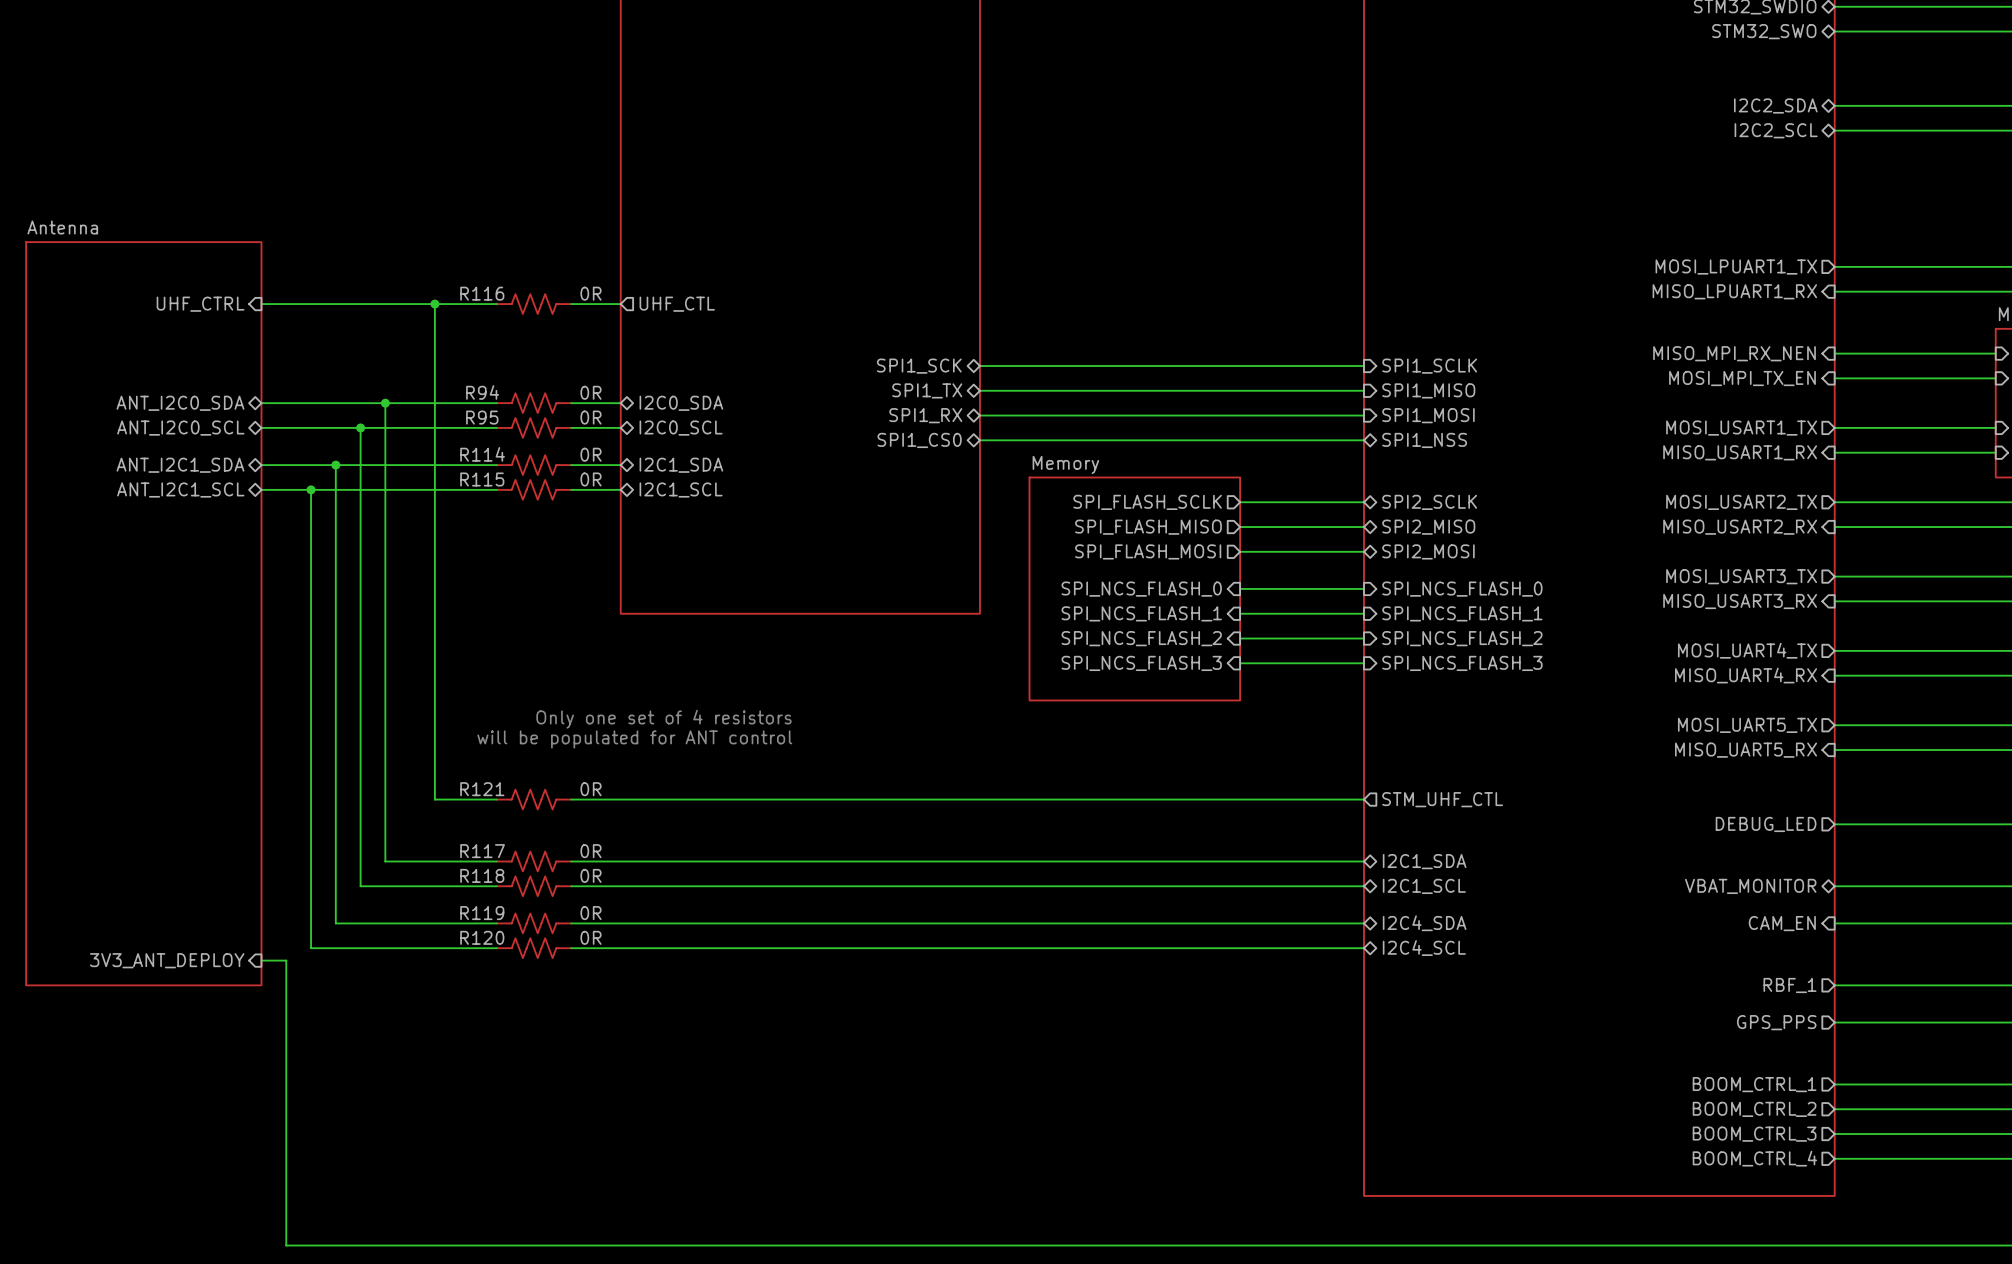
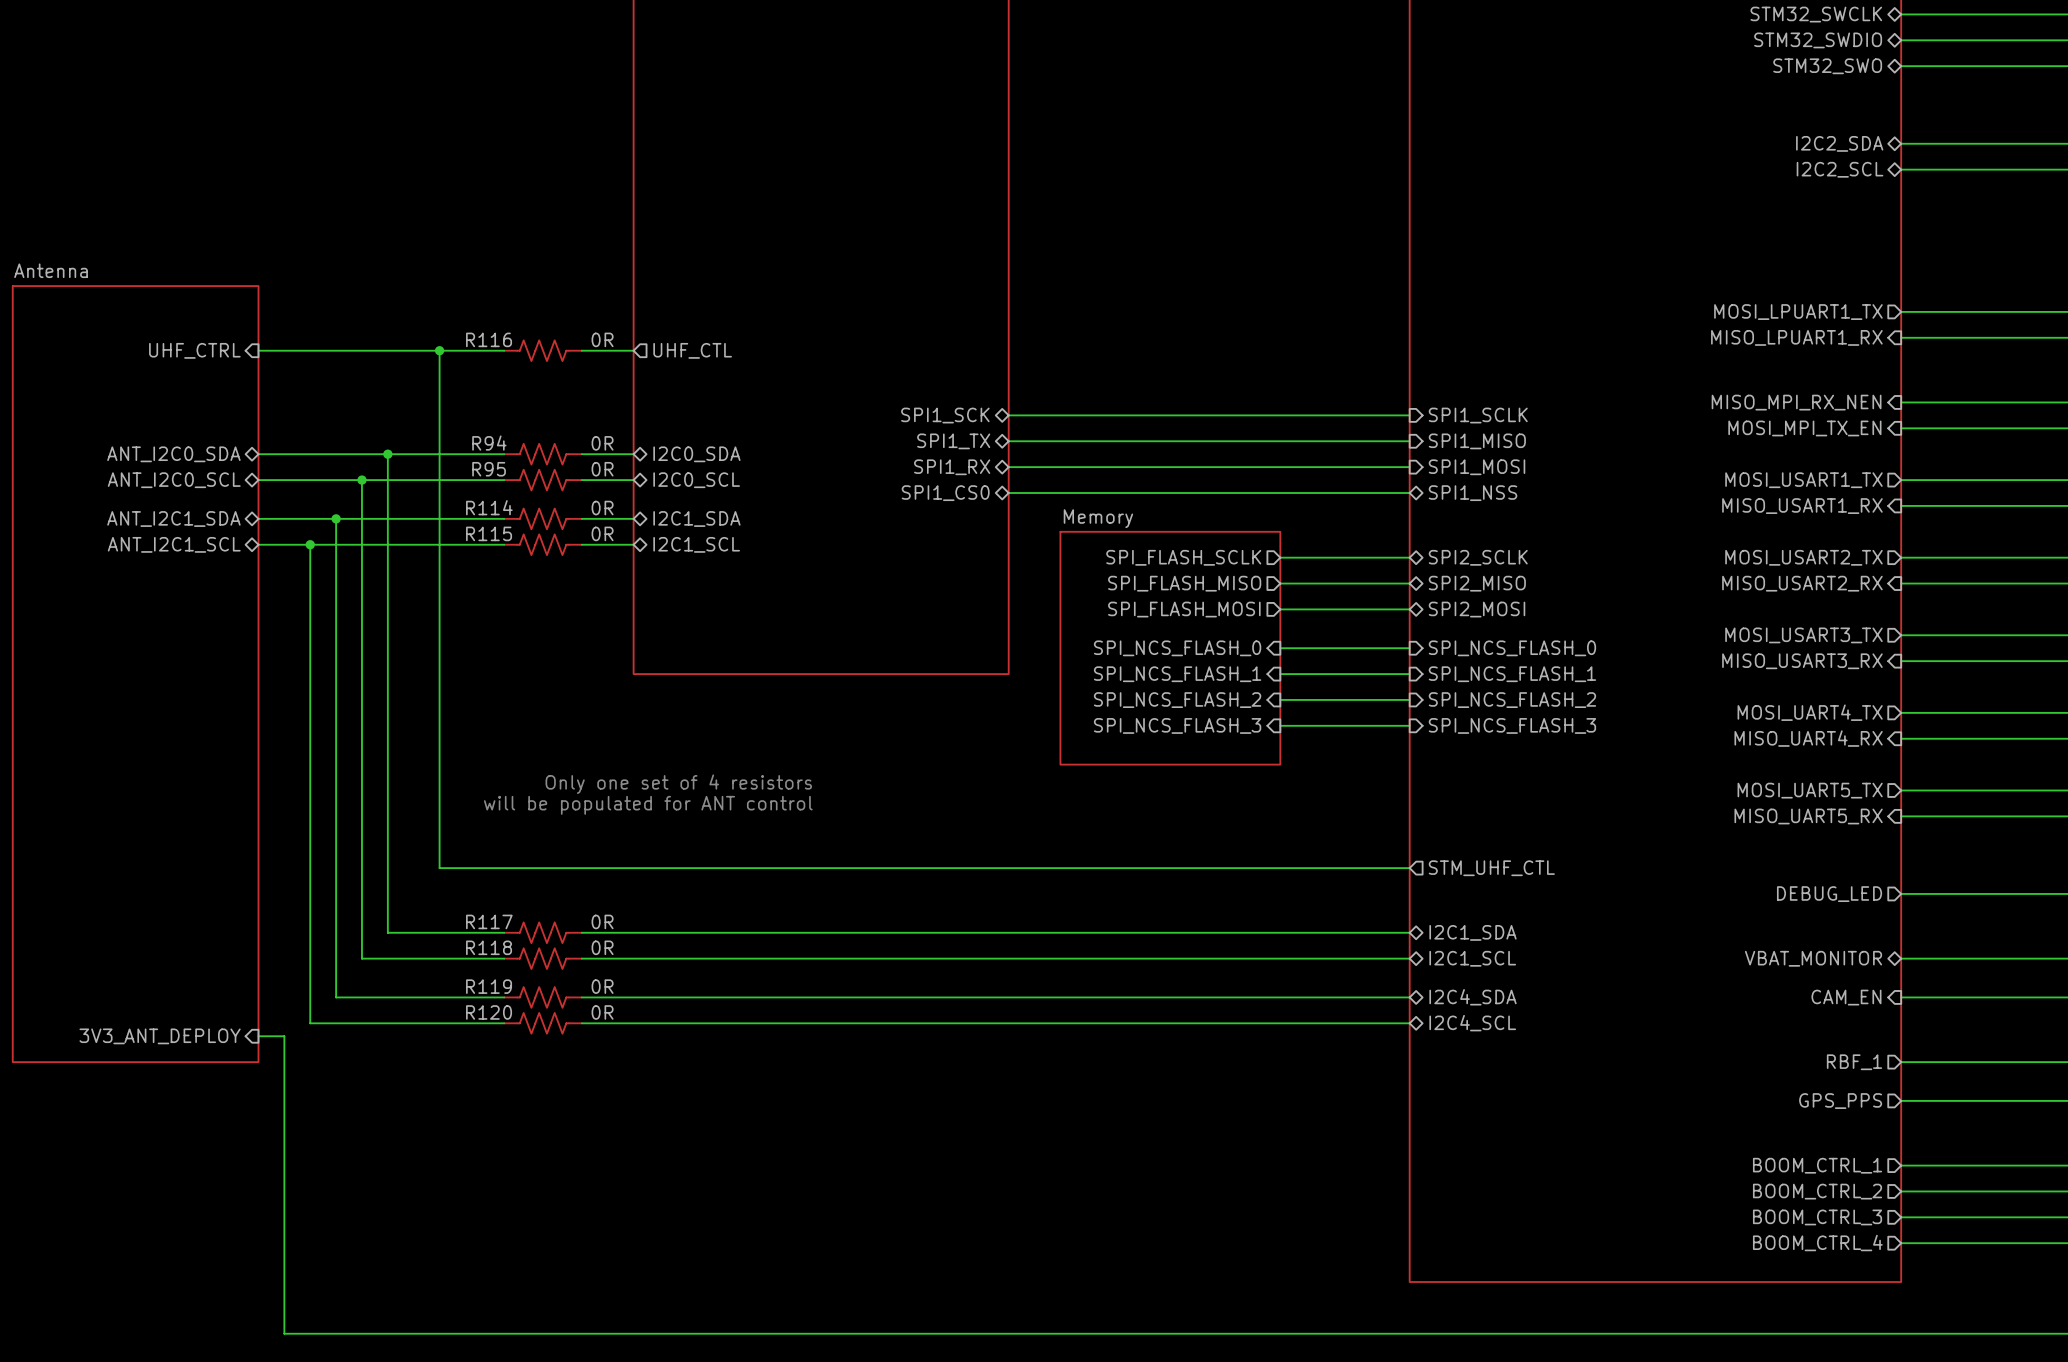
R121: 0R (534, 799) -> none

